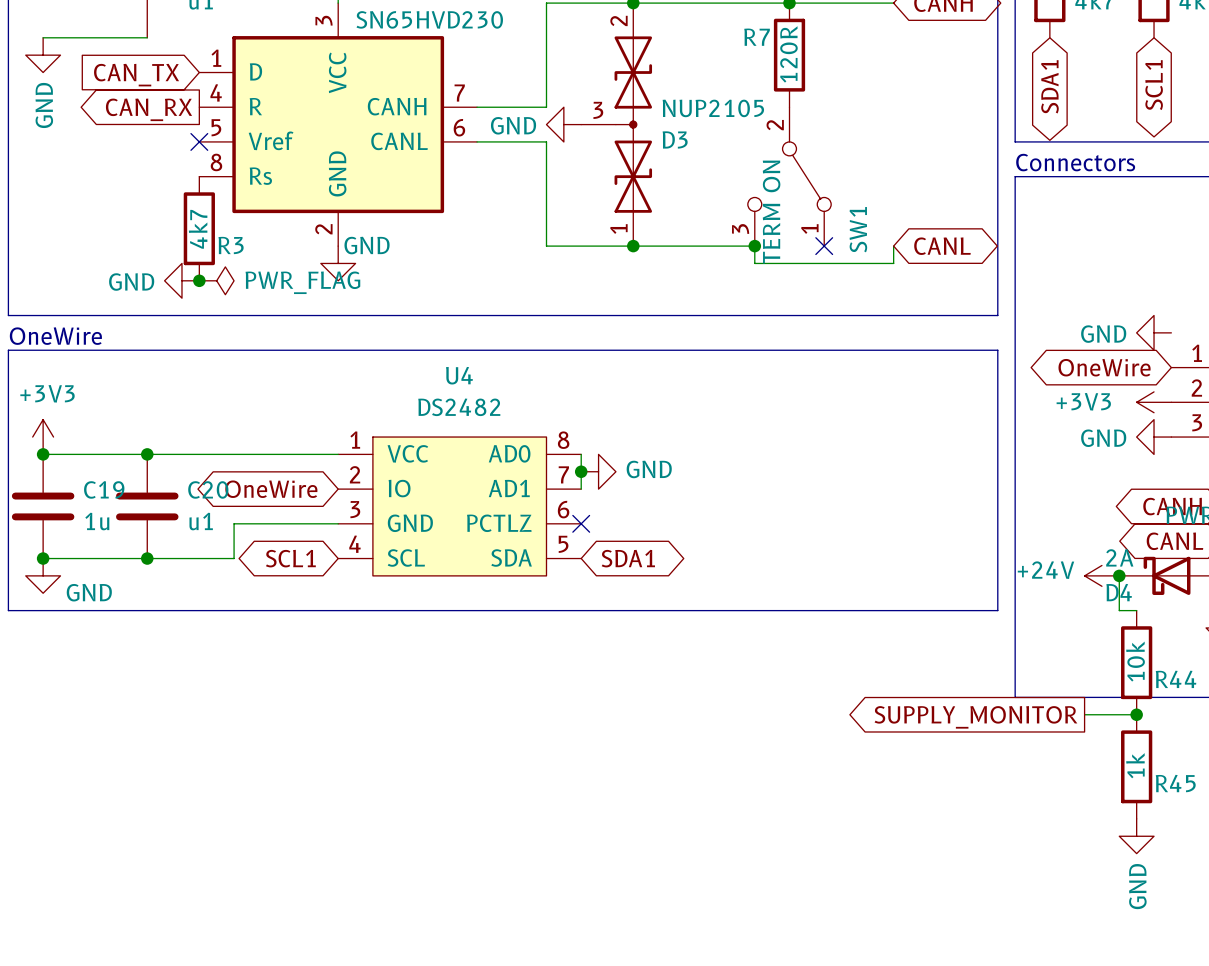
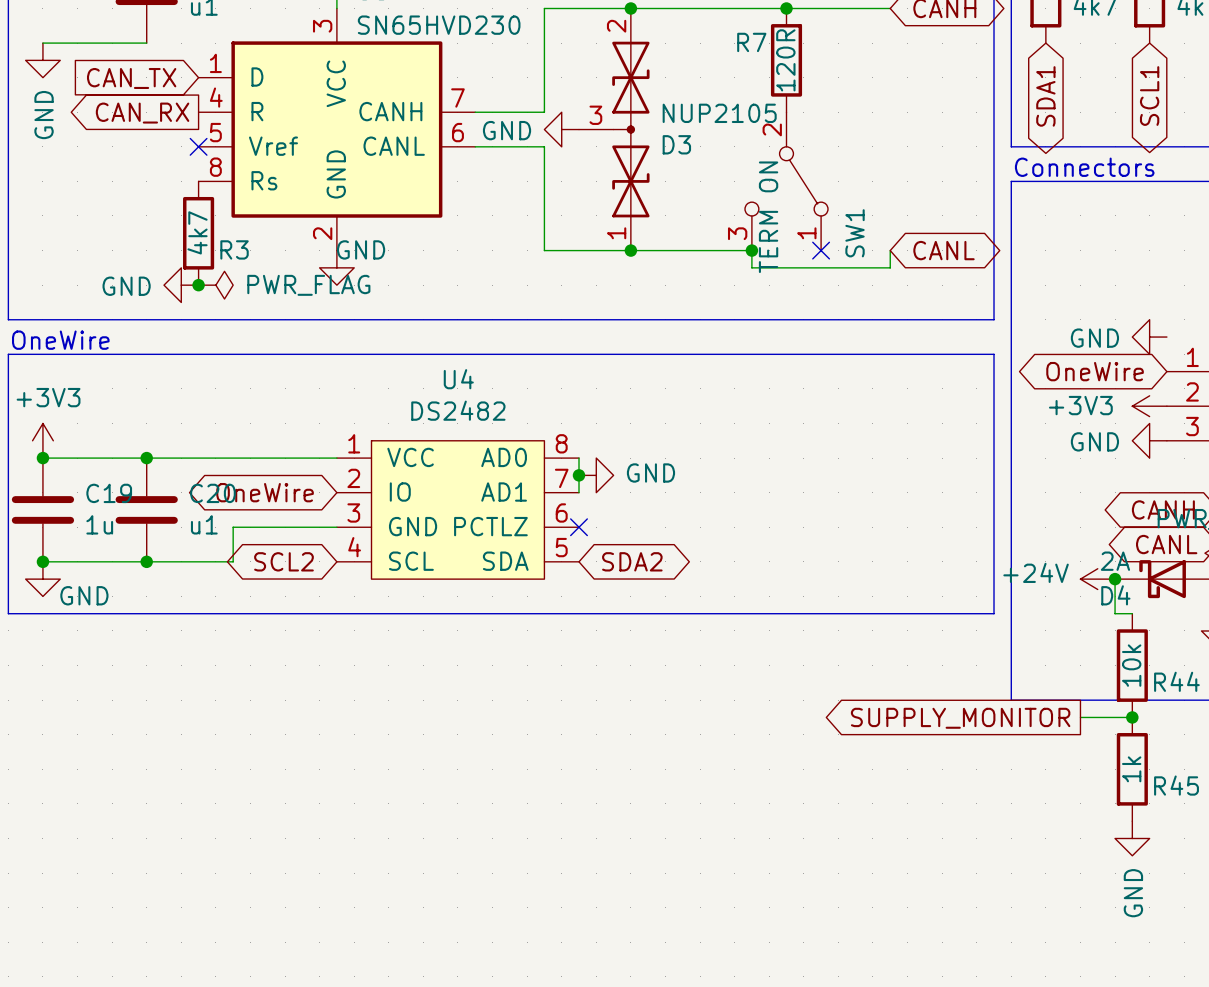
global label: SCL1 (290, 558) -> SCL2 (283, 561)
global label: SDA1 (628, 558) -> SDA2 (632, 561)

